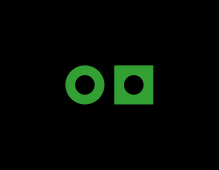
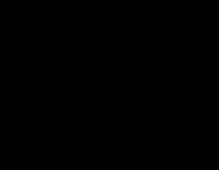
part: (109, 84) -> none

